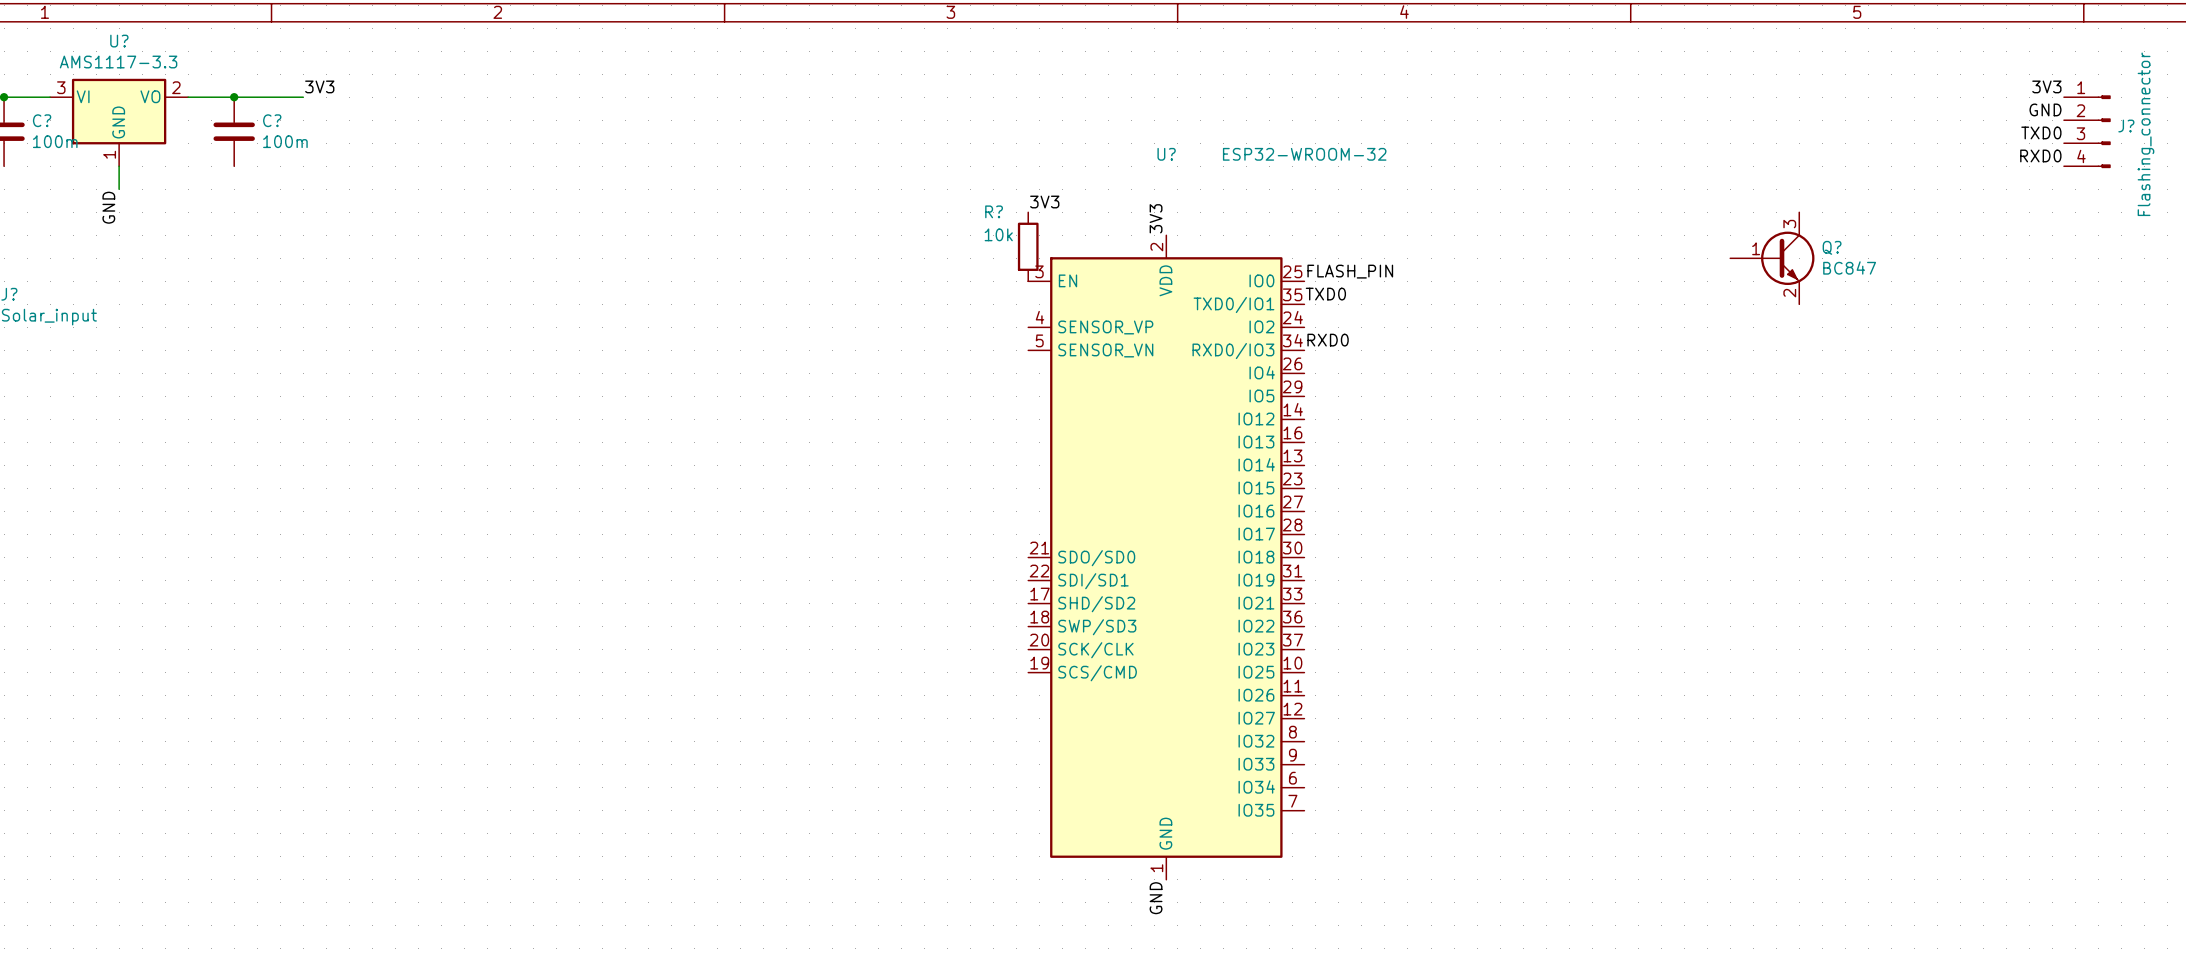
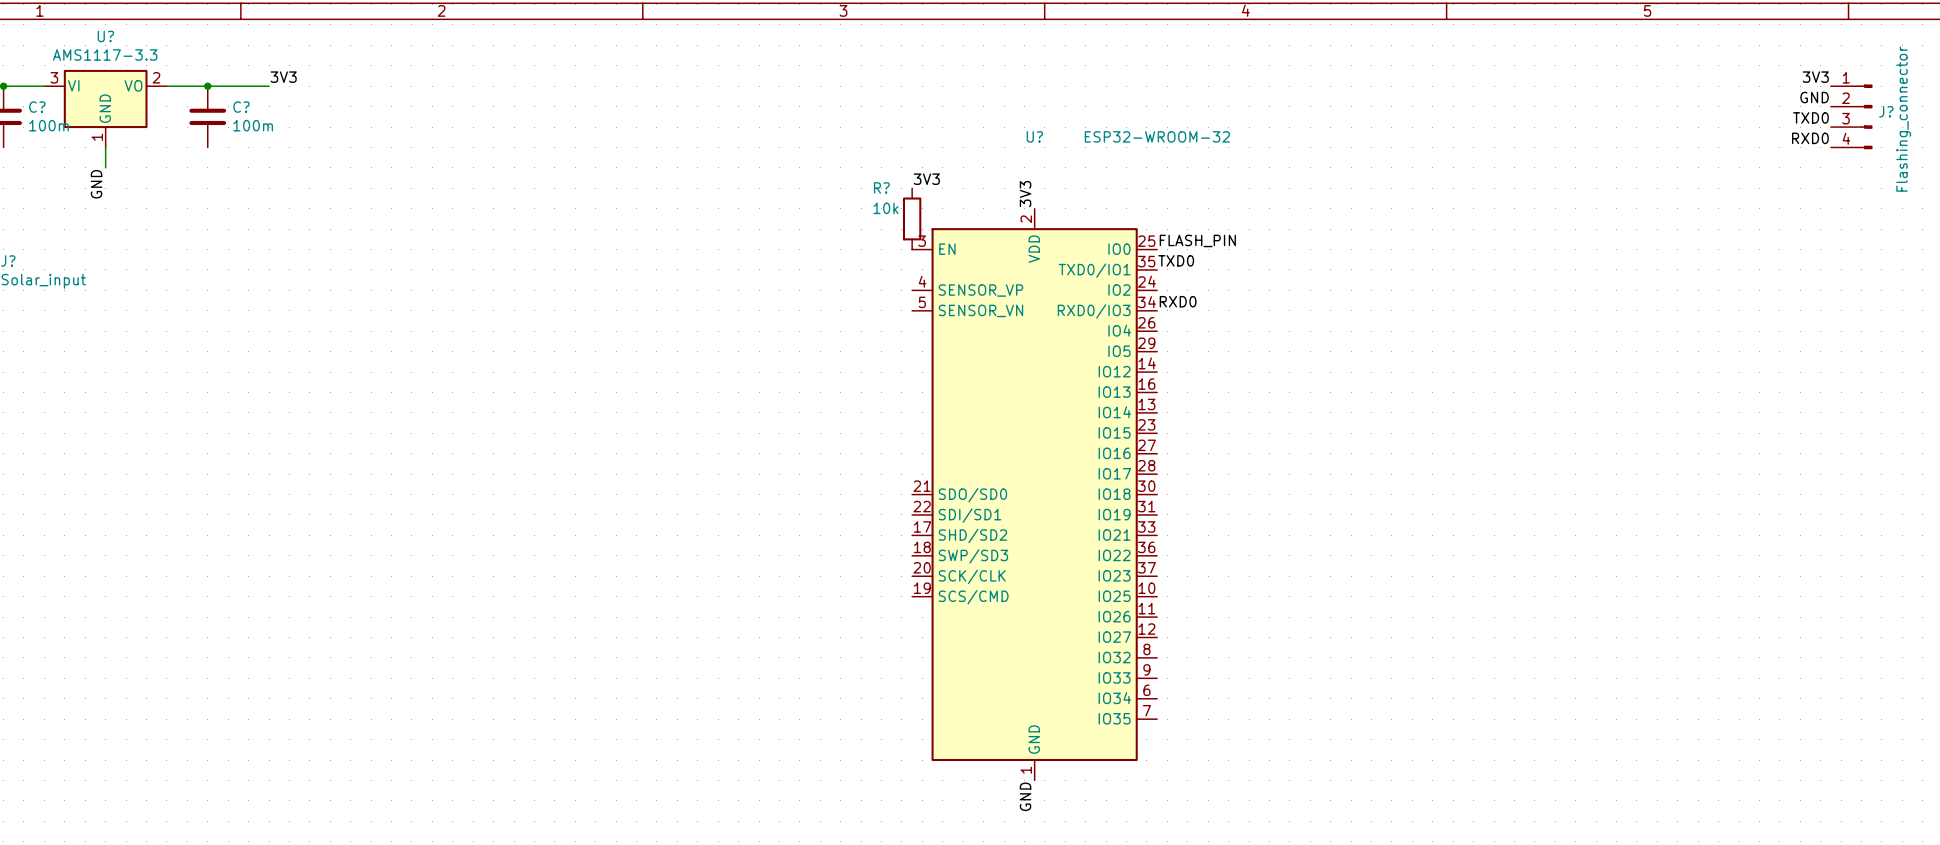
Q?: BC847 (1772, 258) -> none

